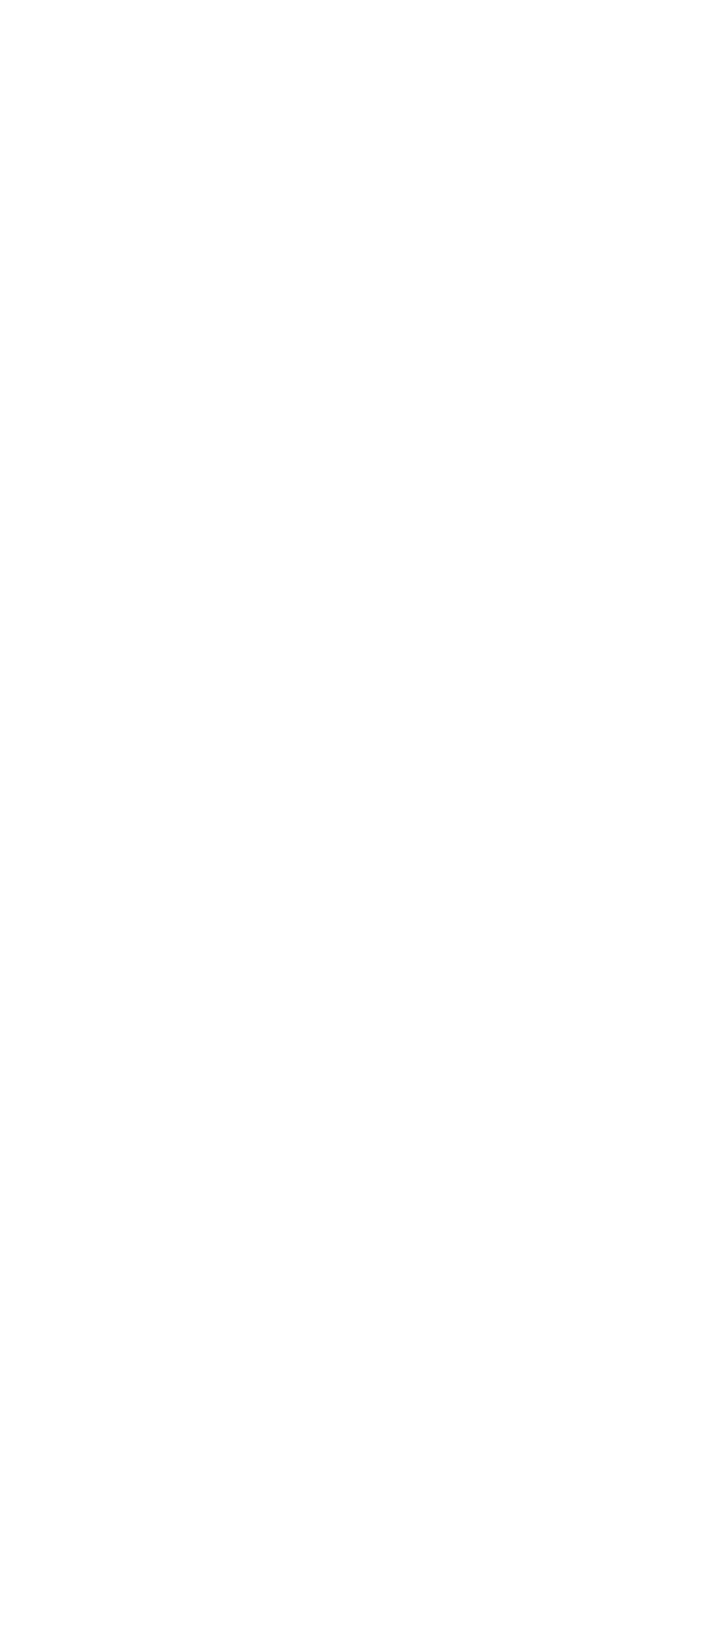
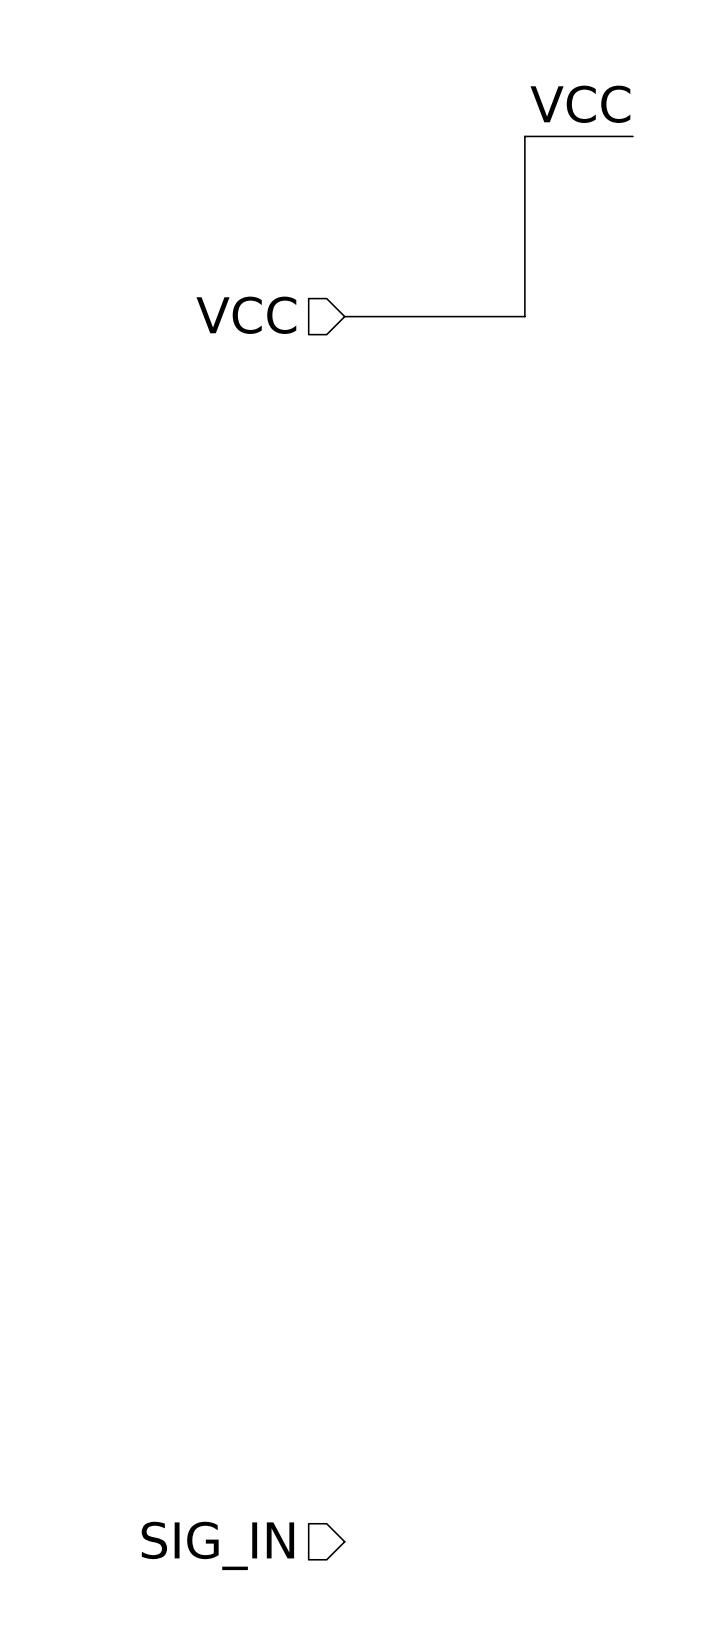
label: none -> VCC (580, 104)
wire: none -> (632, 136) (524, 136) (524, 316) (344, 316)
hierarchical label: none -> VCC (246, 315)
hierarchical label: none -> SIG_IN (217, 1545)

